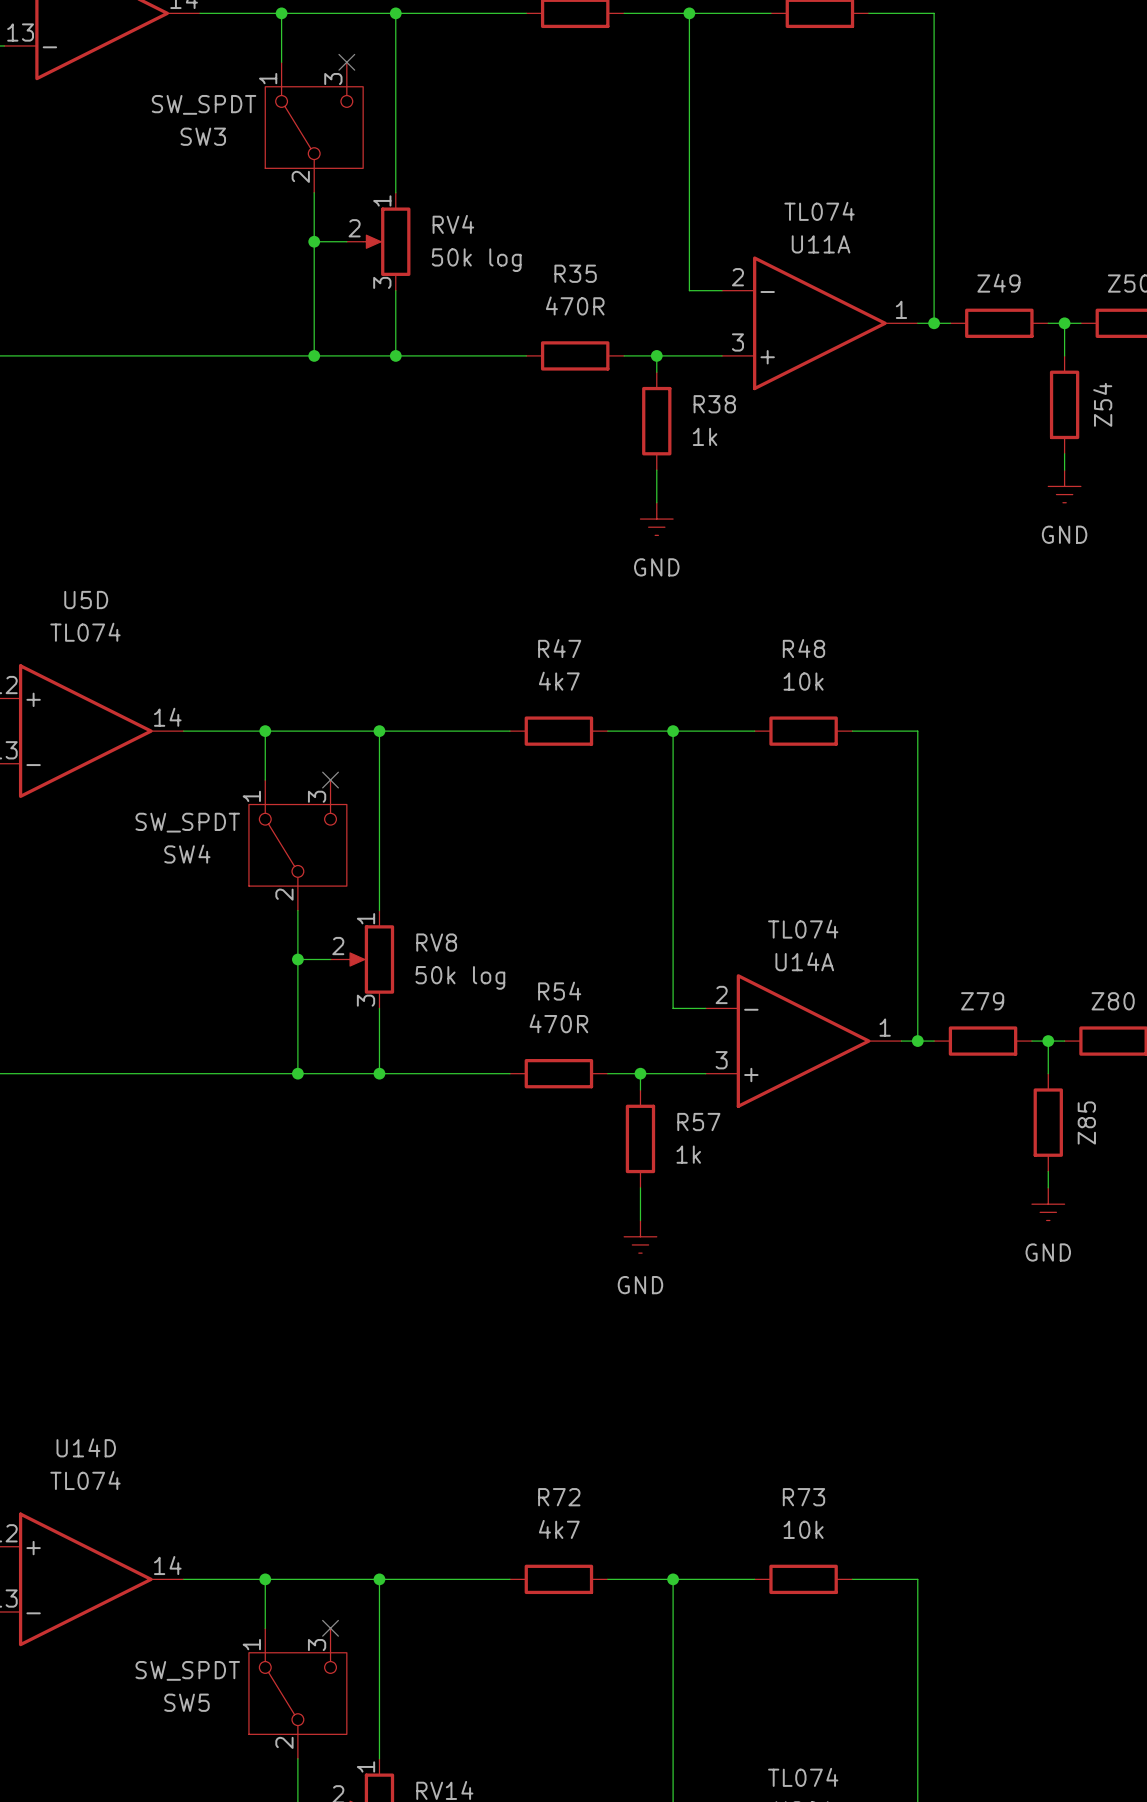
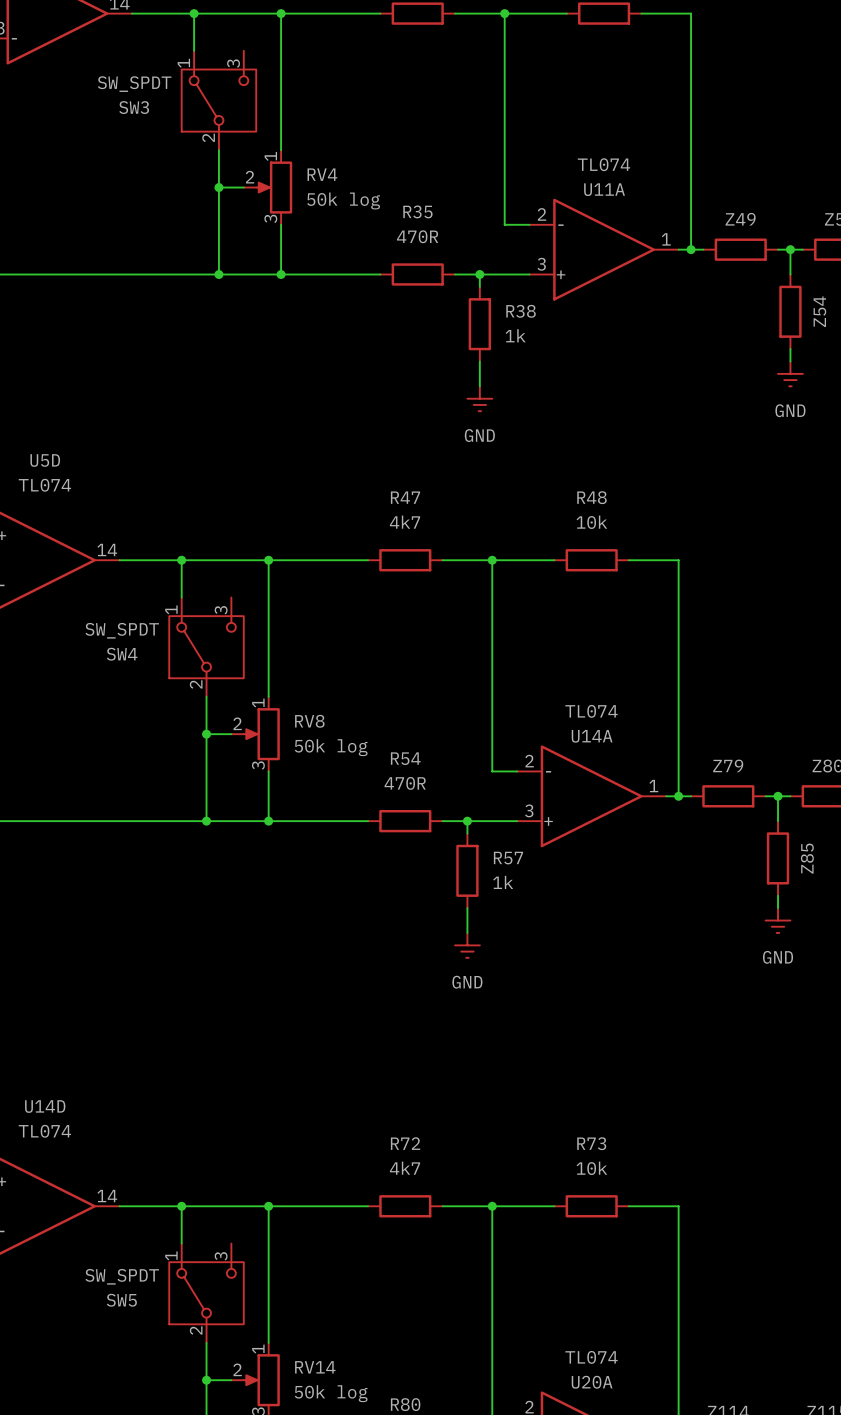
no-connect mark: (346, 62) -> none
no-connect mark: (330, 780) -> none
no-connect mark: (330, 1628) -> none

